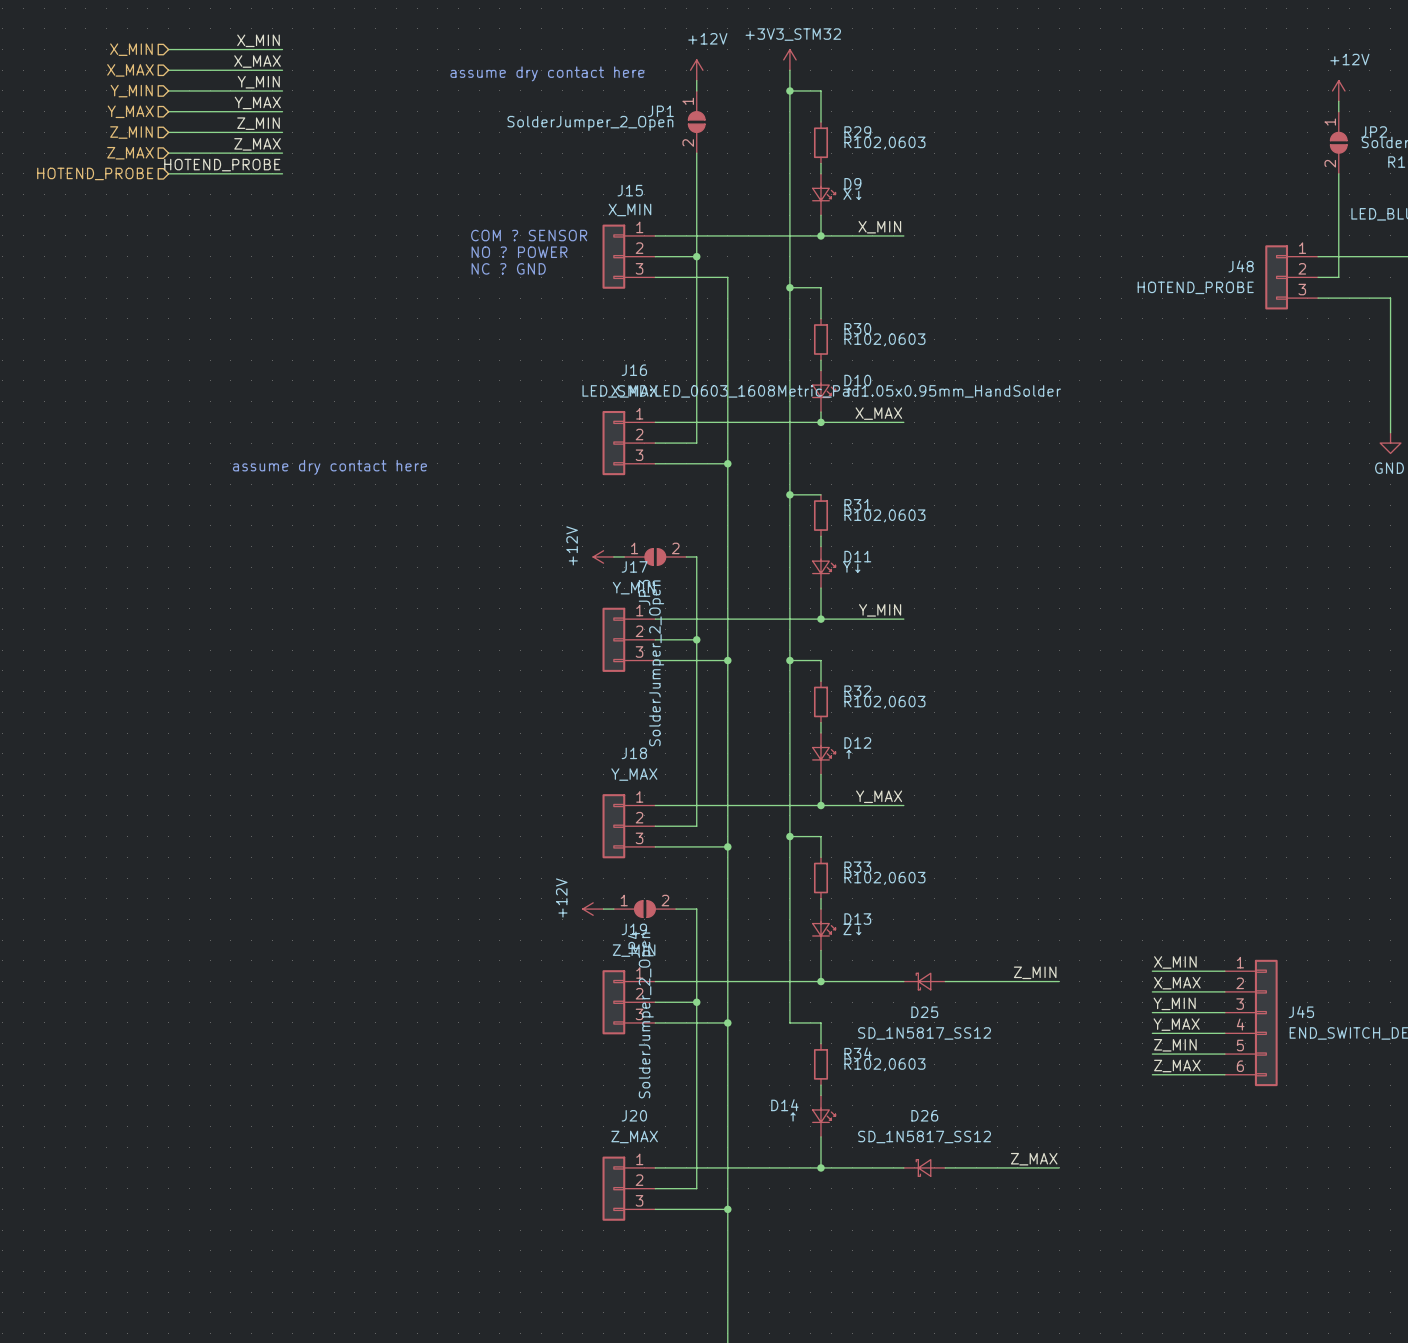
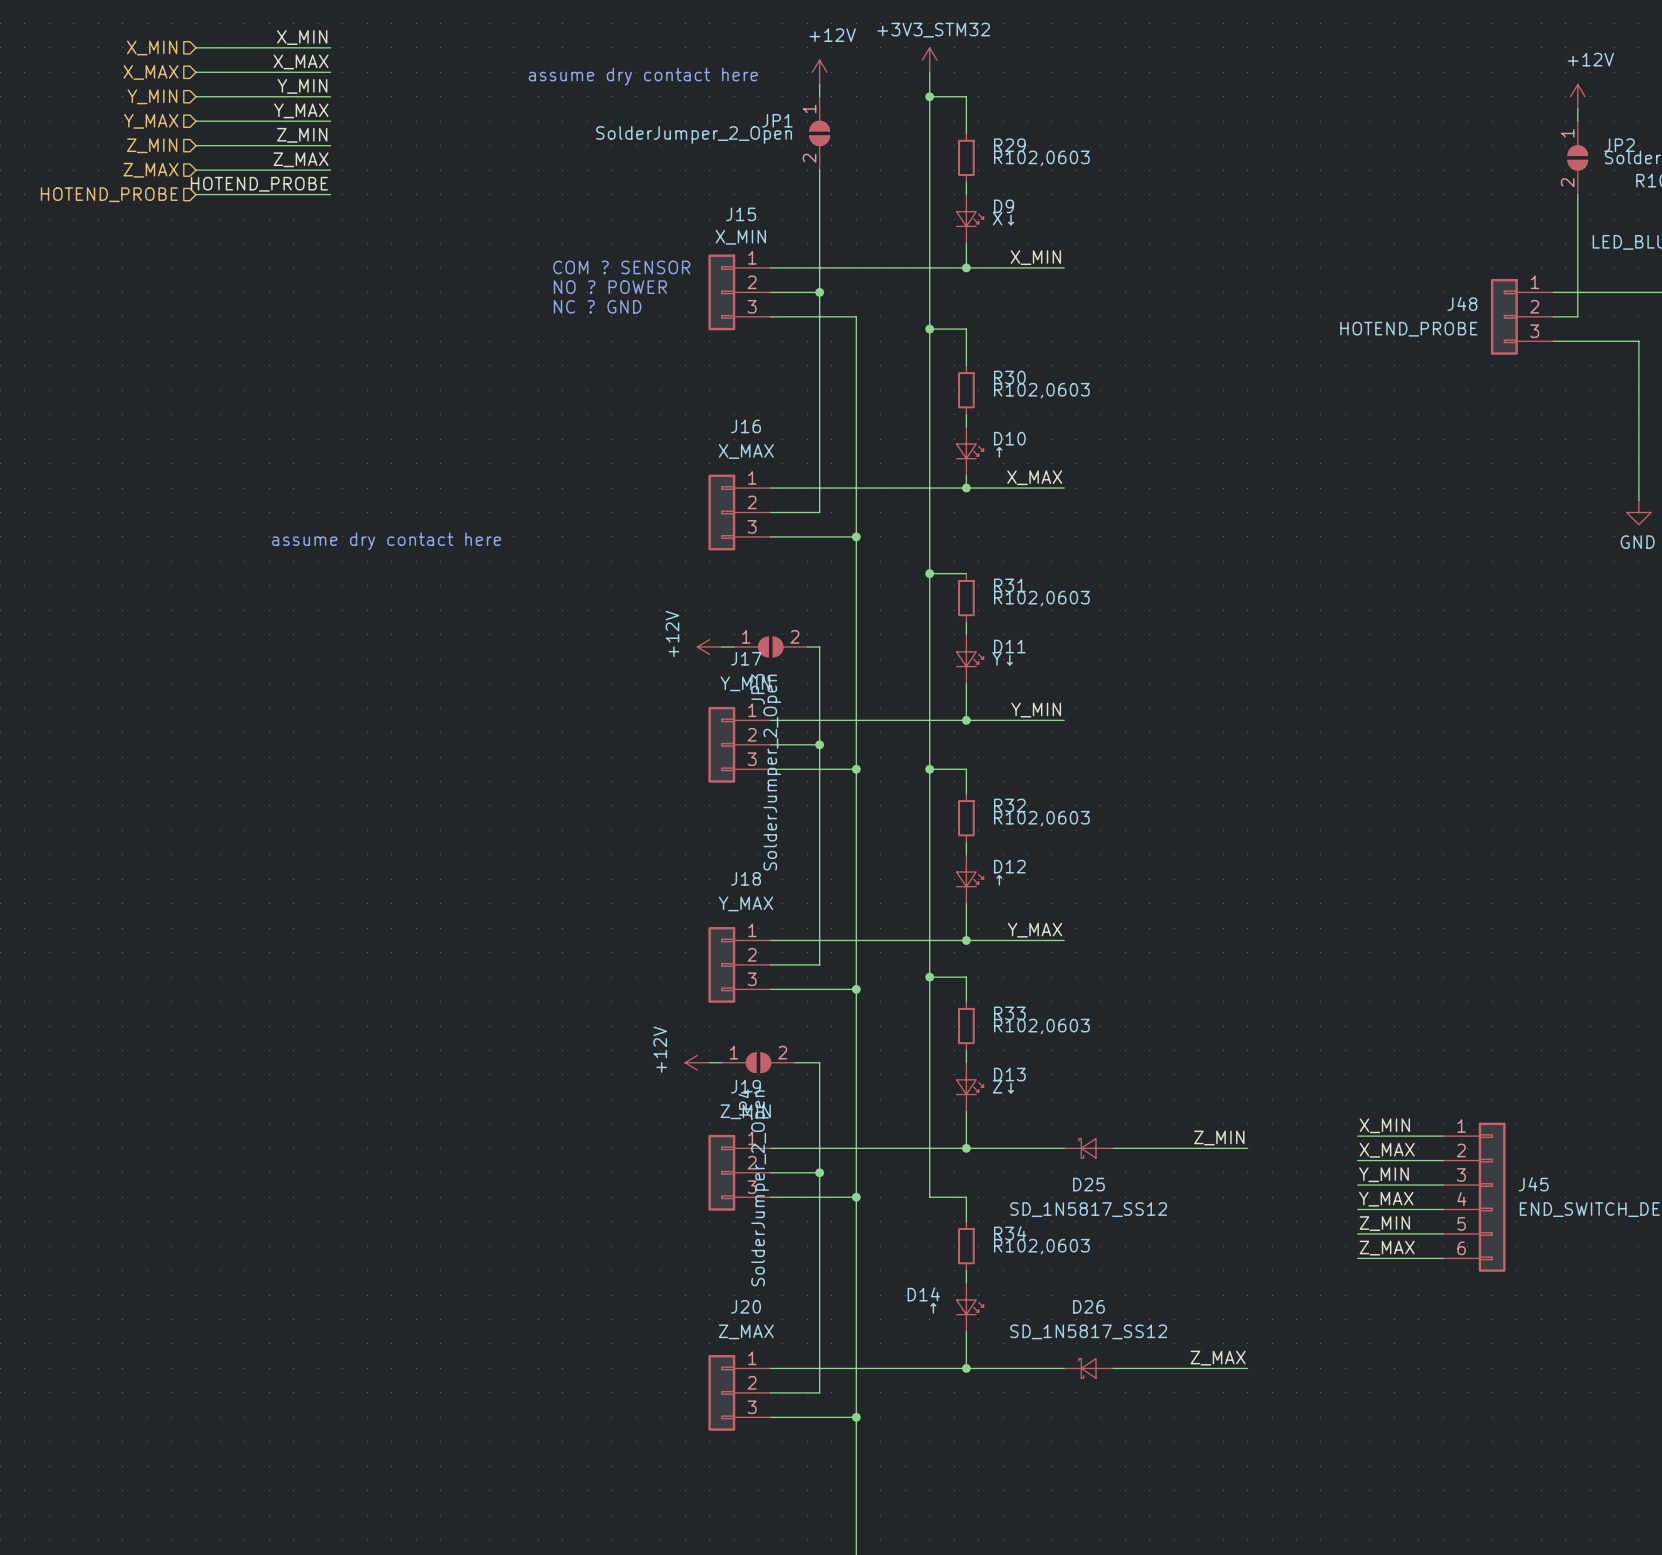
D10 text: LED_SMD:LED_0603_1608Metric_Pad1.05x0.95mm_HandSolder (821, 391) -> none

